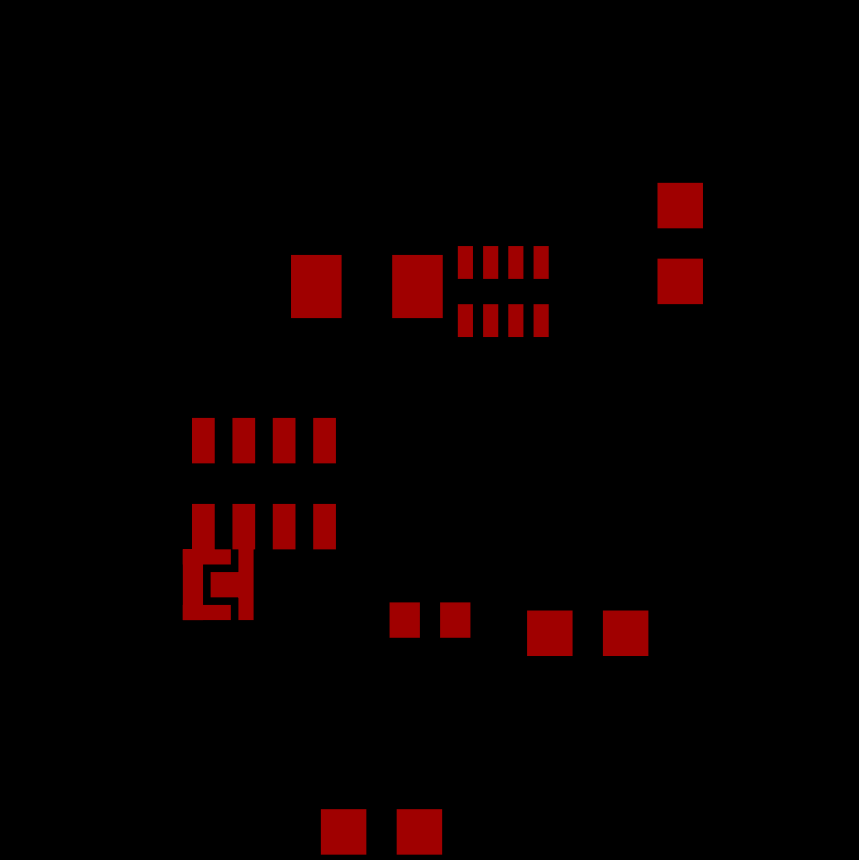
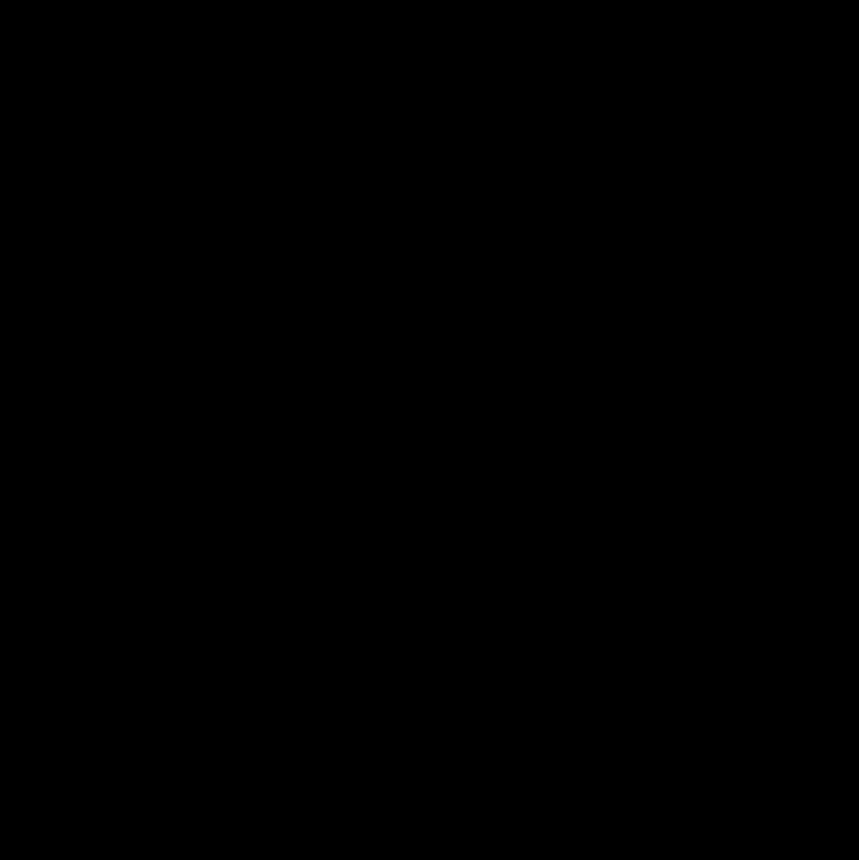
part: (680, 243) -> none
part: (366, 286) -> none
part: (503, 291) -> none
part: (263, 483) -> none
part: (218, 584) -> none
part: (429, 620) -> none
part: (587, 633) -> none
part: (381, 831) -> none

